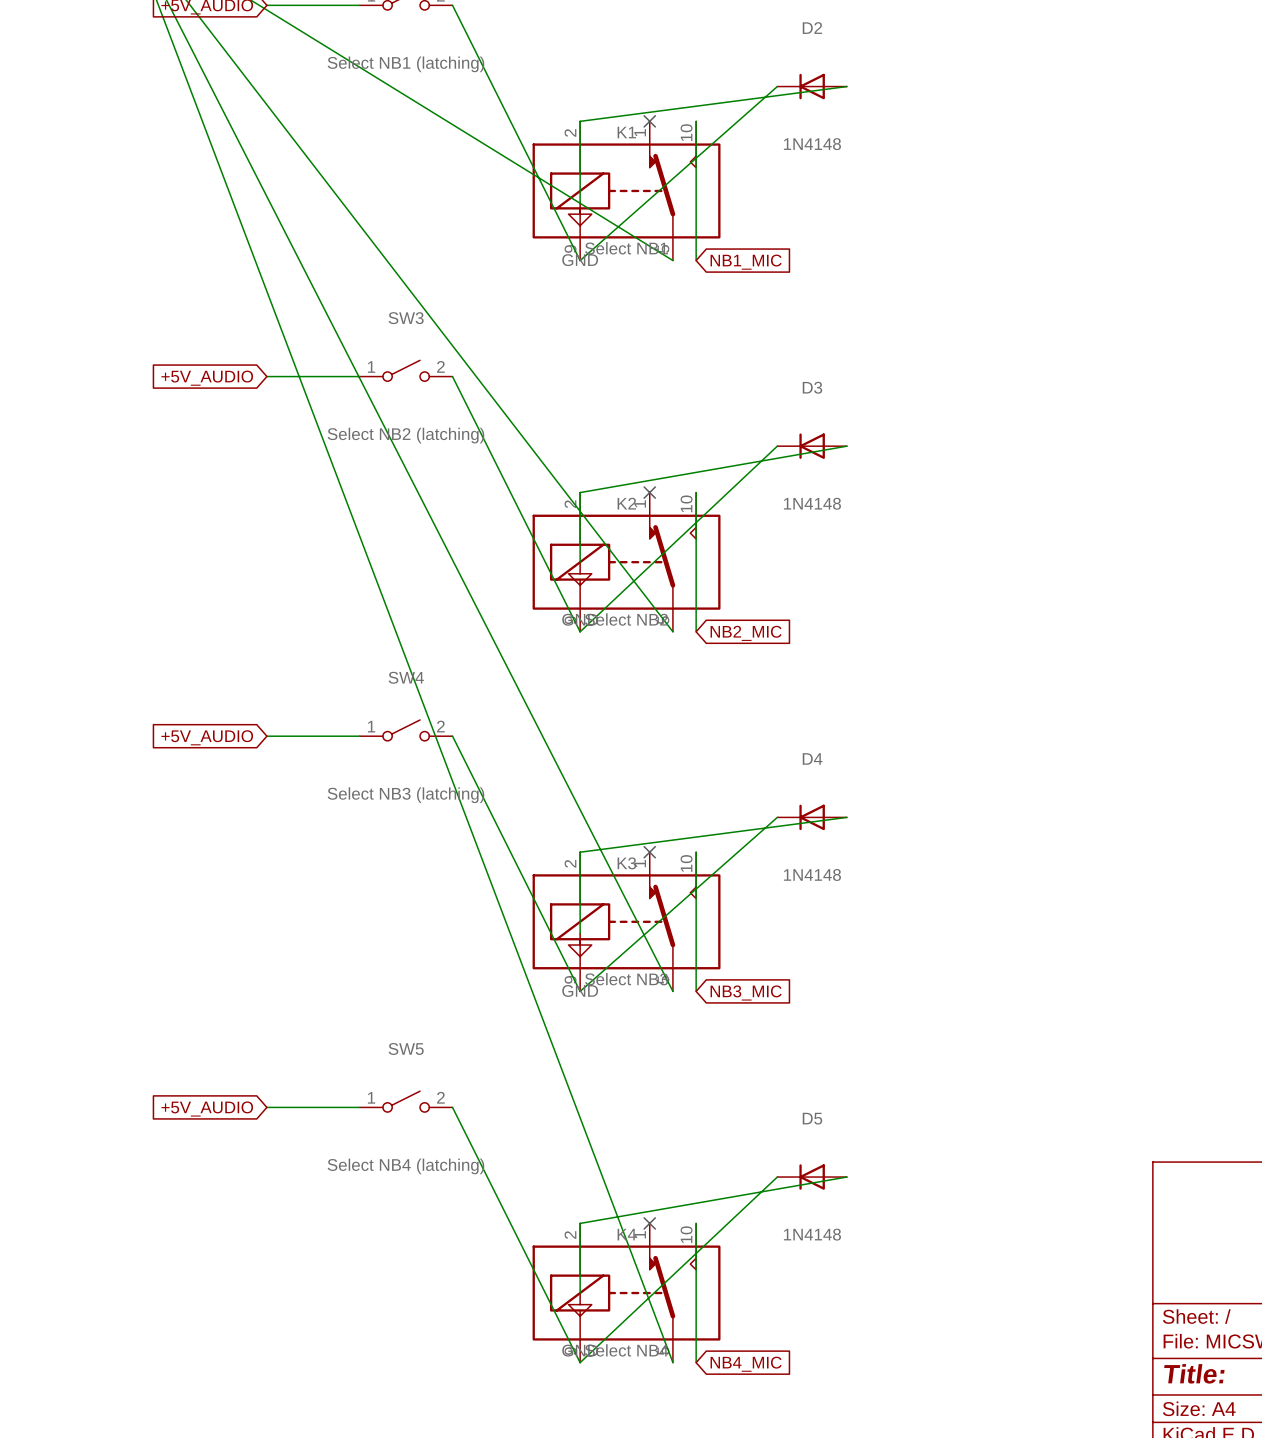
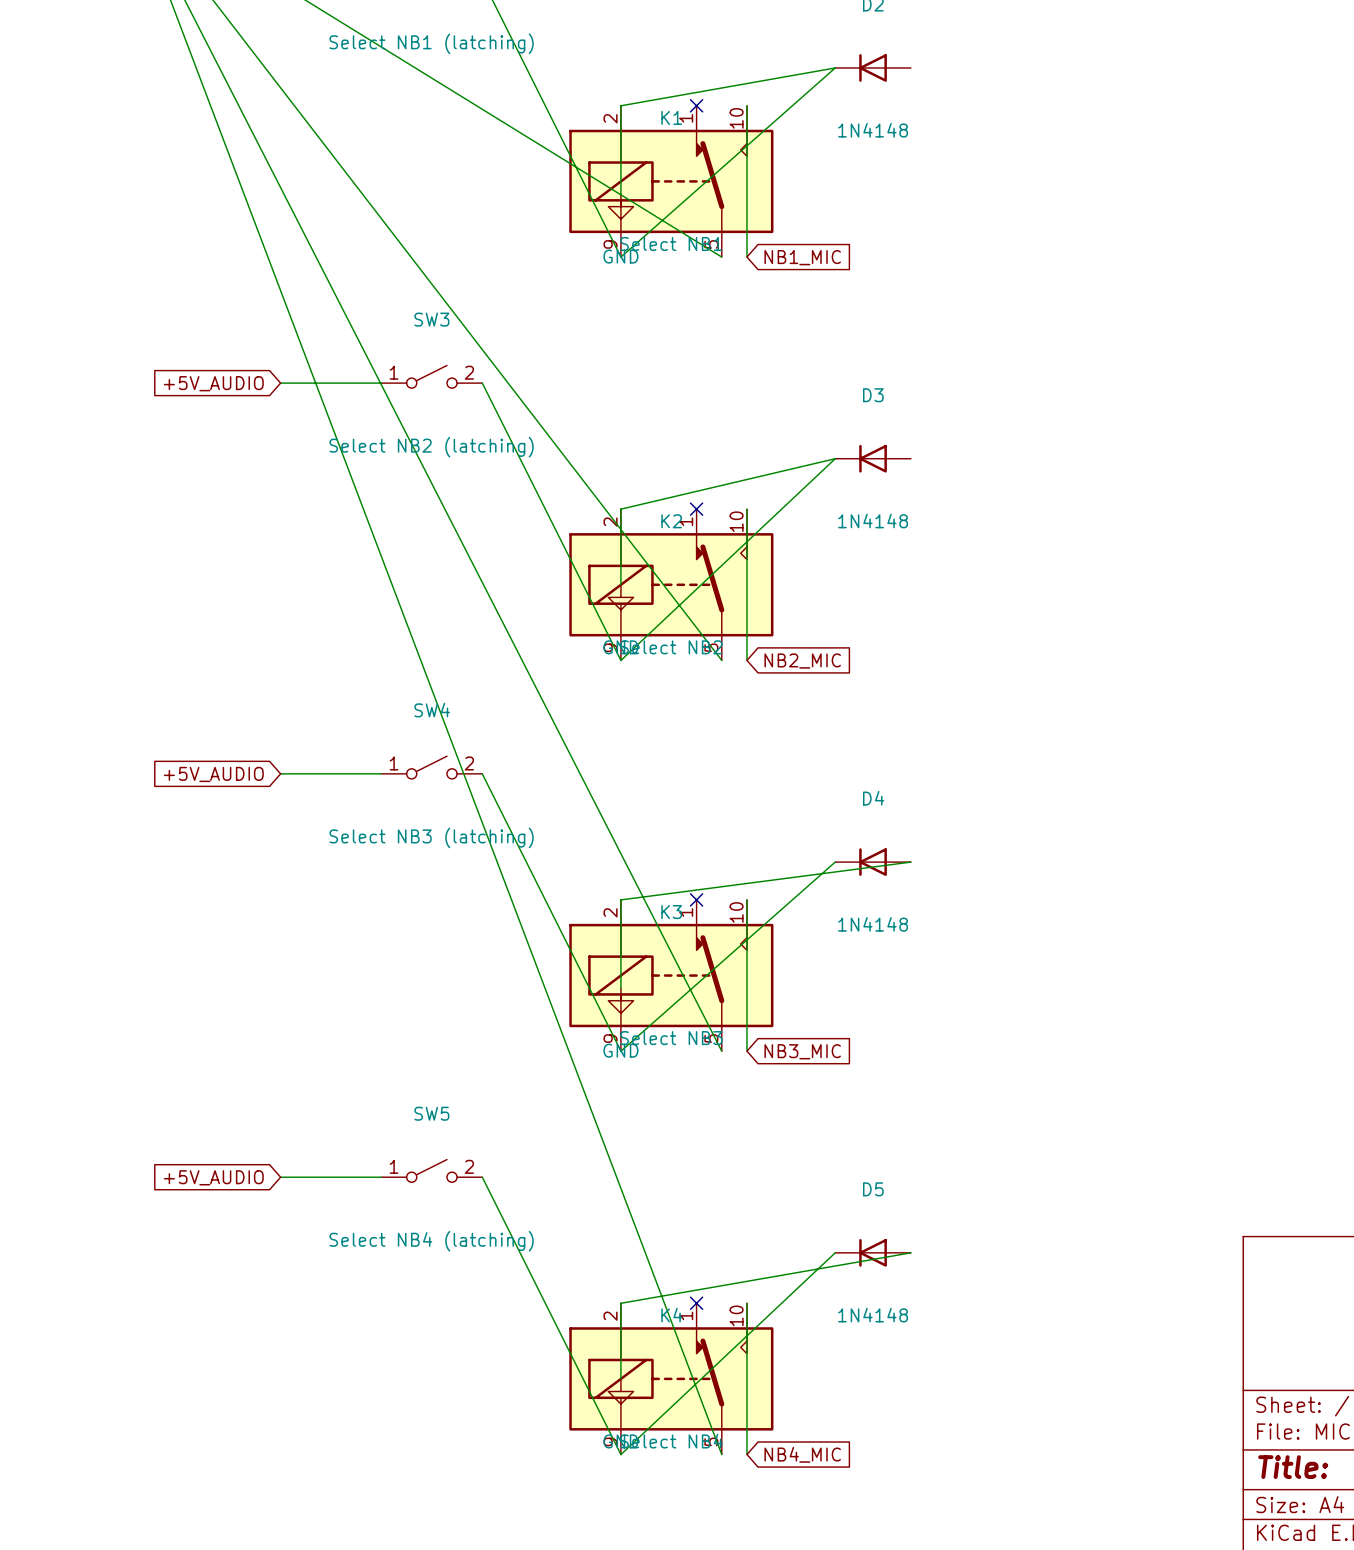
wire: (846, 86) (580, 121) -> (835, 67) (620, 105)
wire: (846, 446) (580, 492) -> (835, 458) (620, 509)

